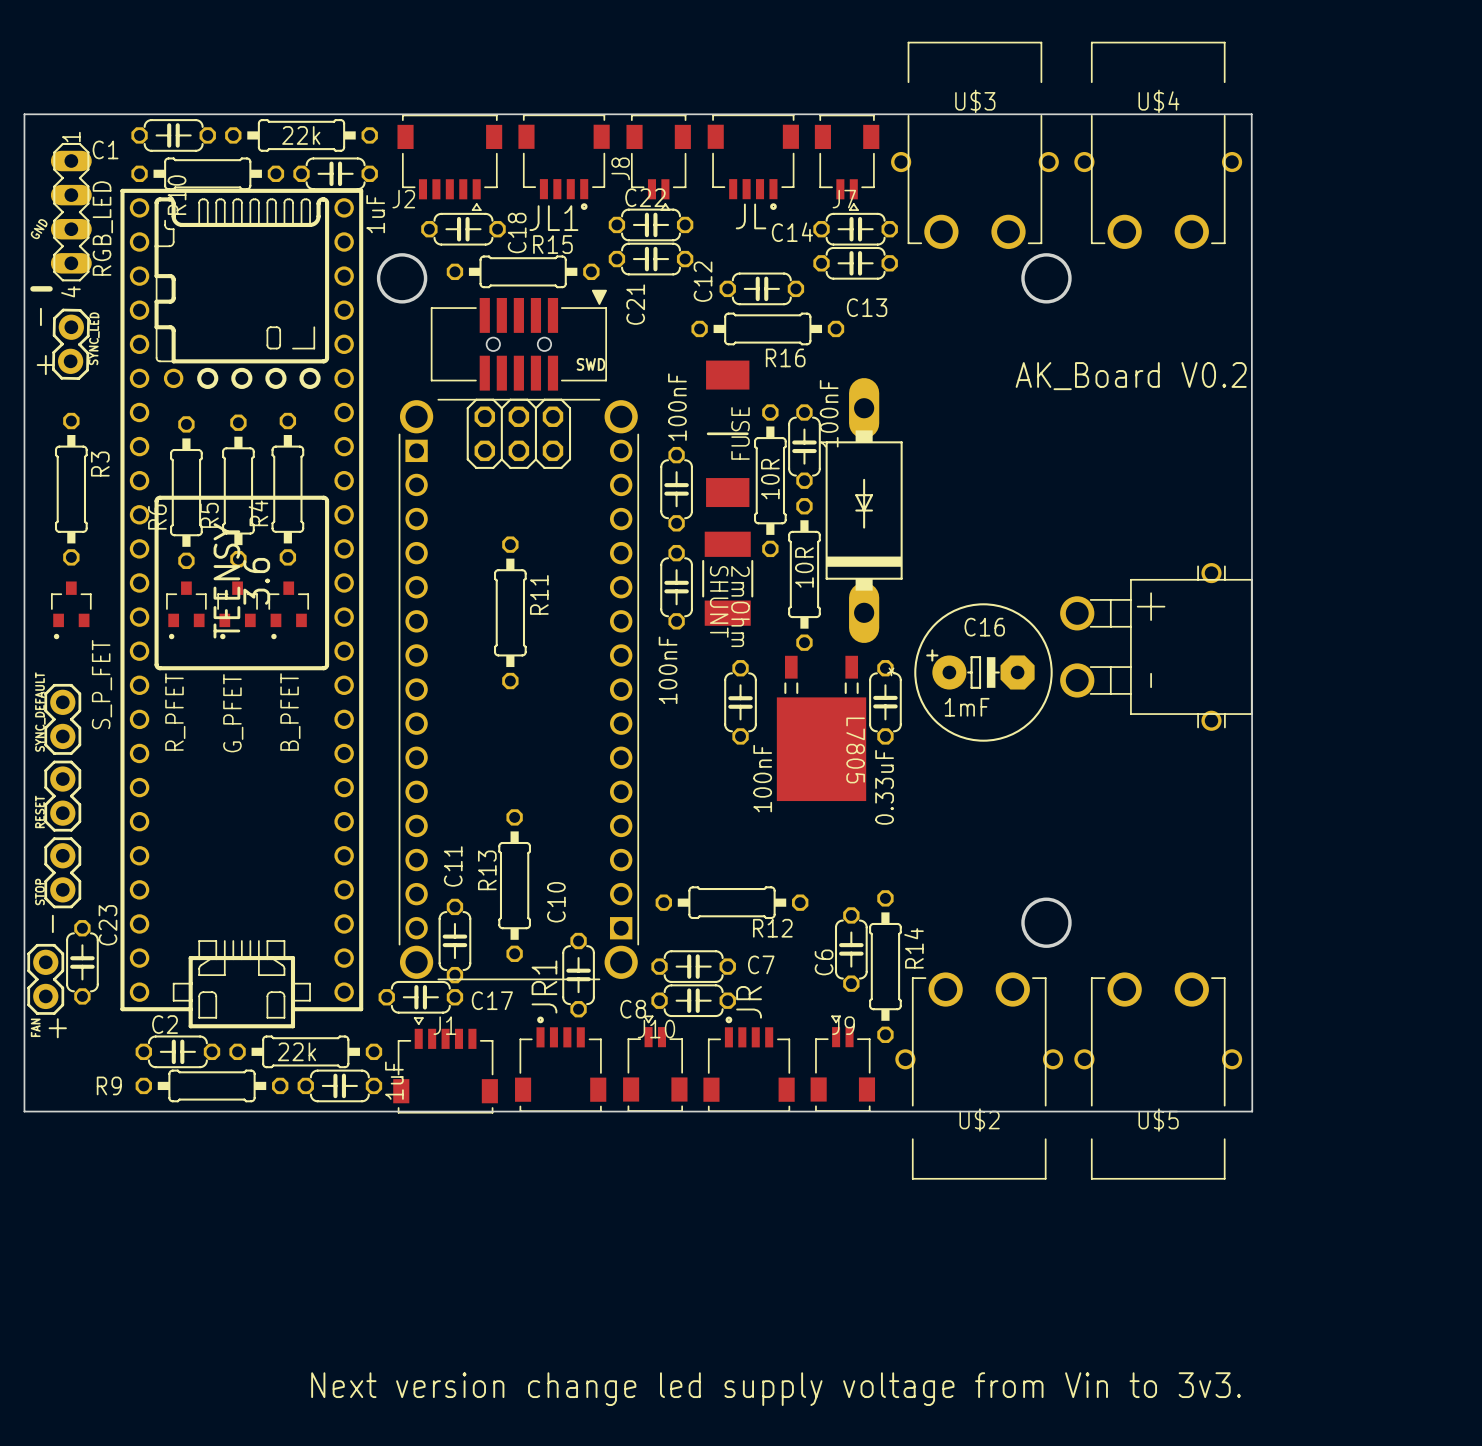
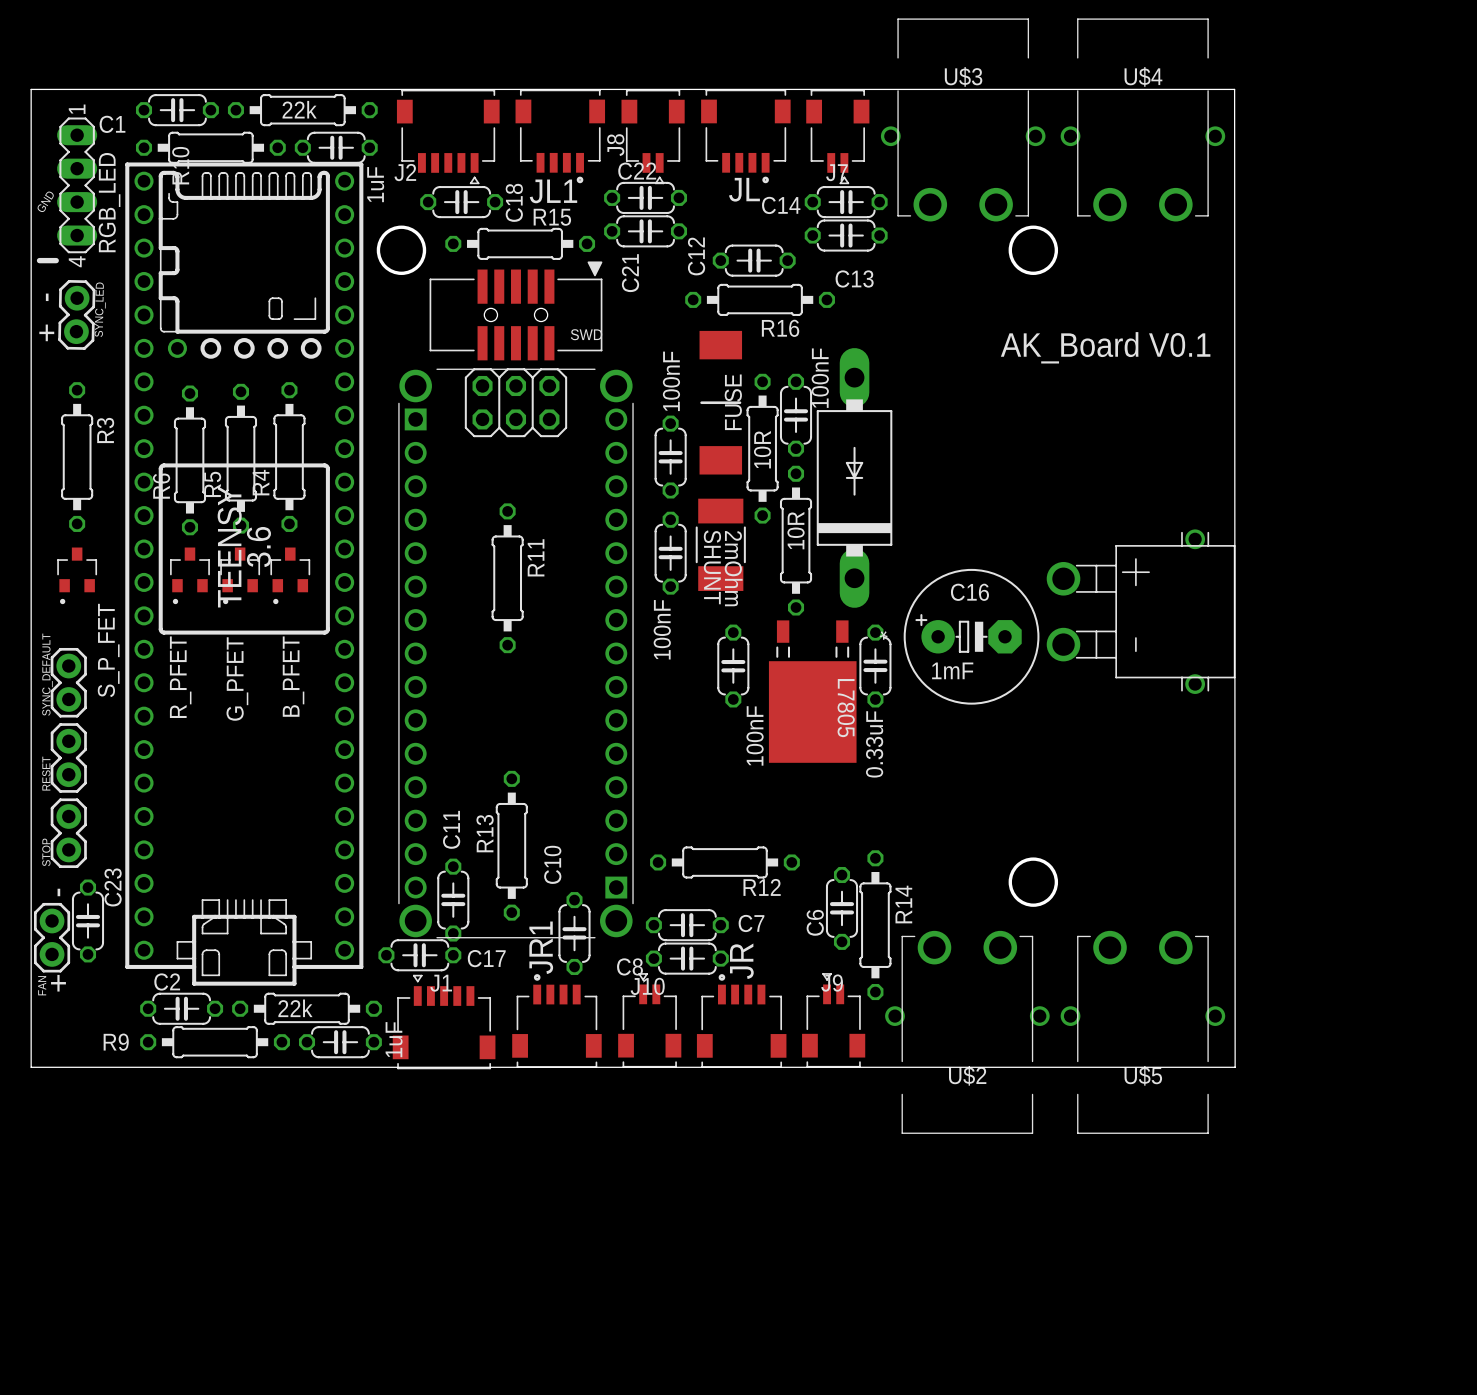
text: AK_Board V0.2 (1131, 376) -> AK_Board V0.1 (1105, 347)
text: Next version change led supply voltage from Vin to 3v3. (776, 1389) -> none

